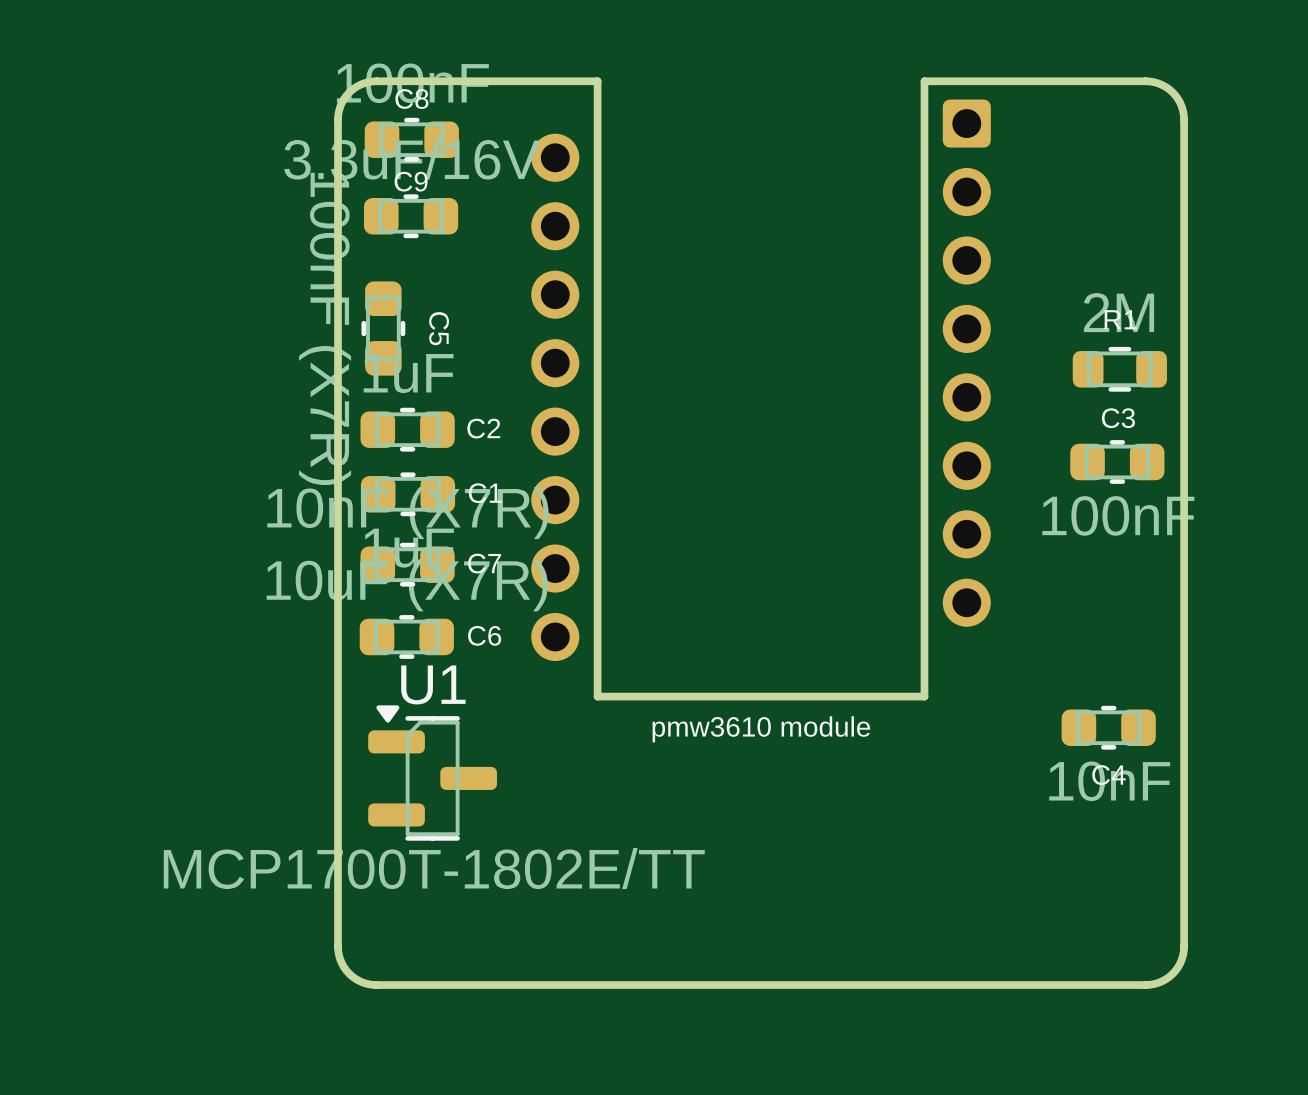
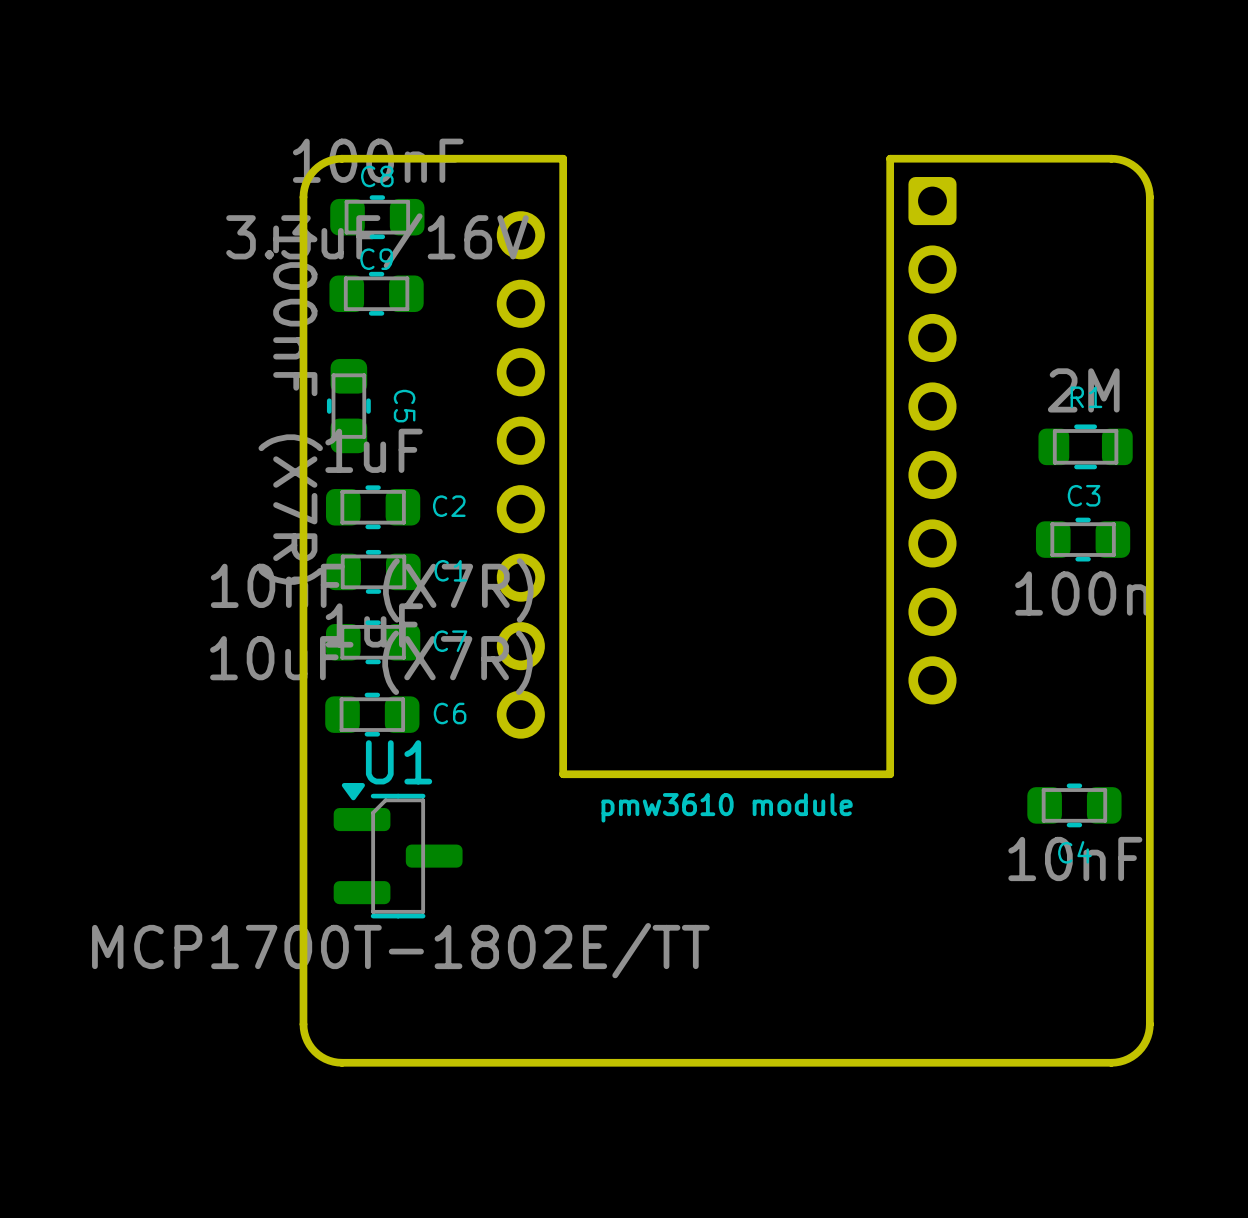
C3 value: 100nF (1118, 515) -> 100n (1082, 593)

